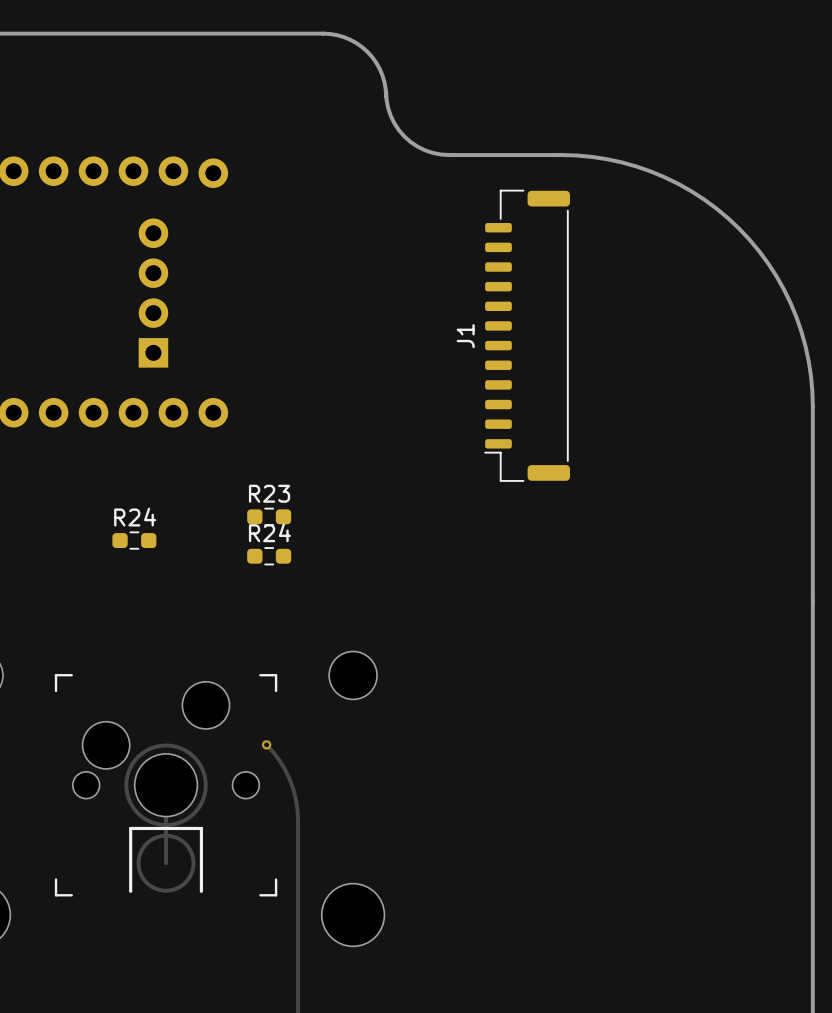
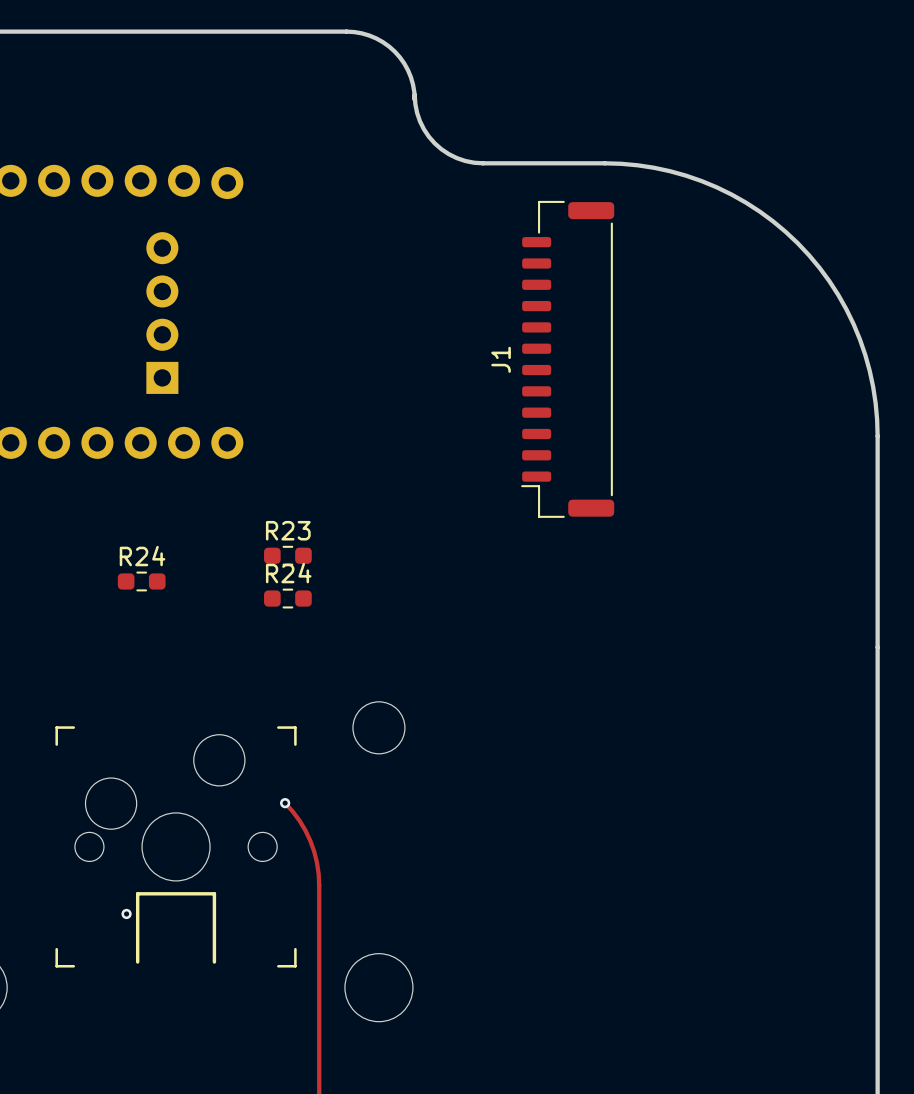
drawing: [124, 743, 208, 893] -> none
track: (166, 785) (166, 863) -> none
via: none -> (126, 913)

